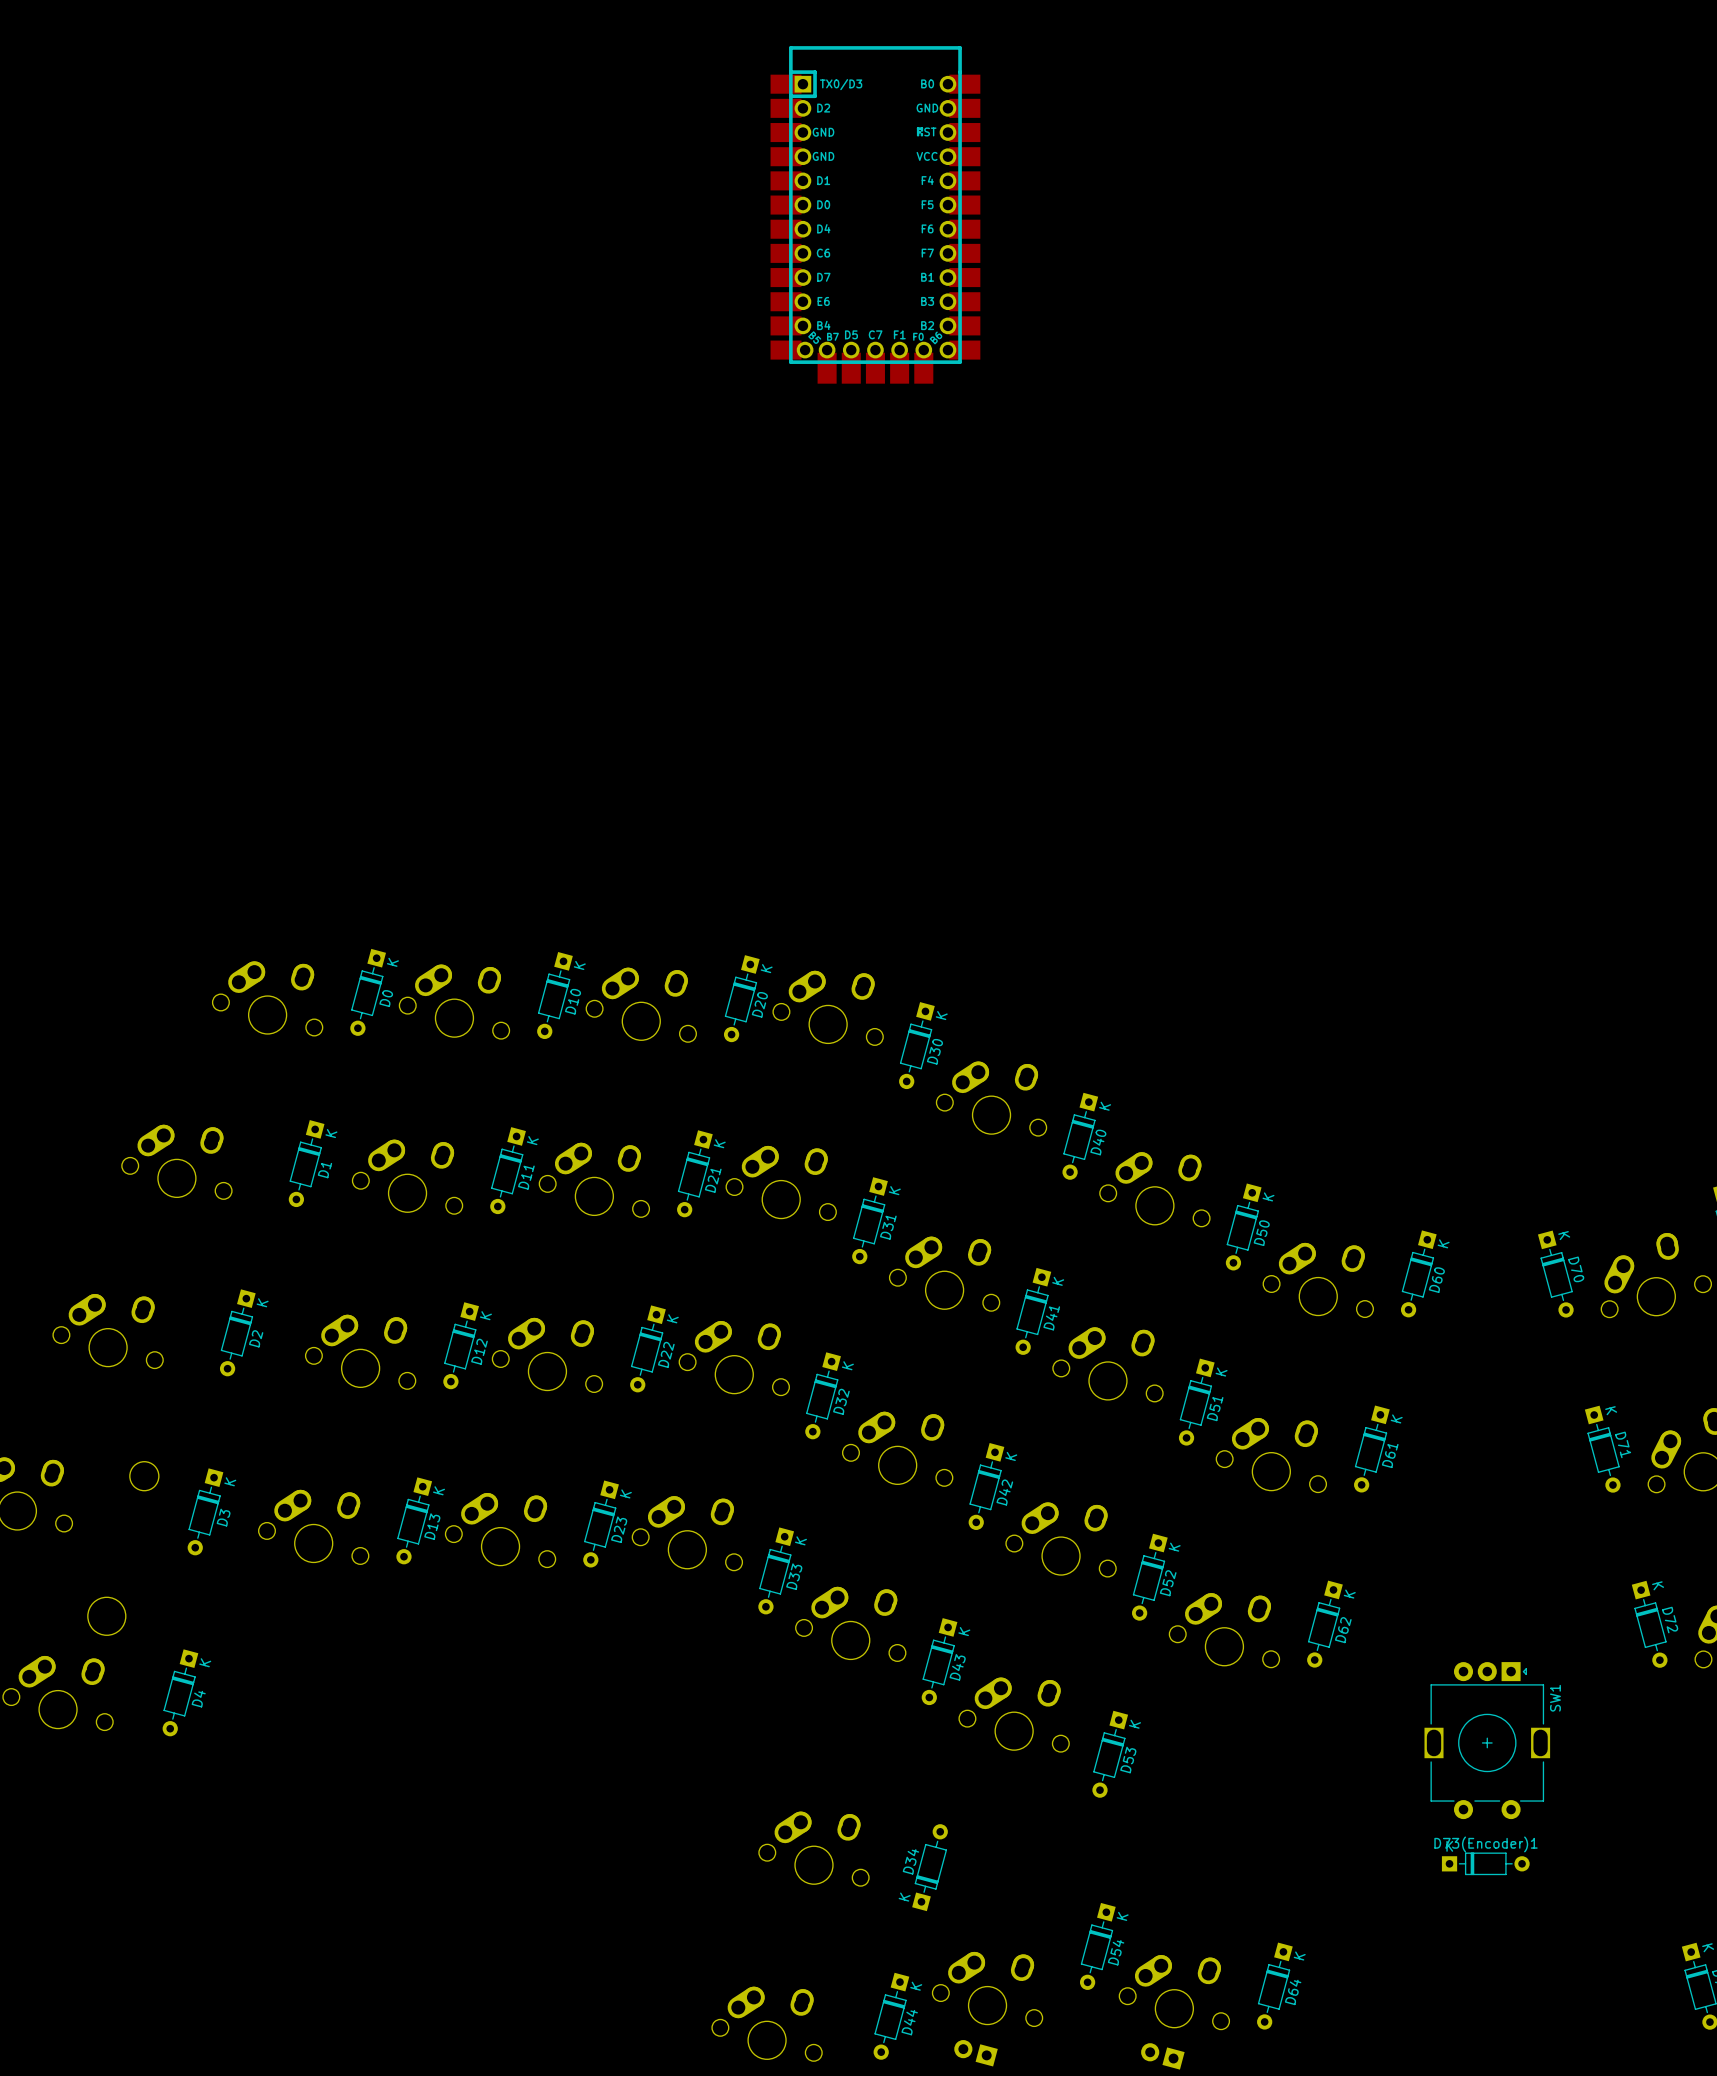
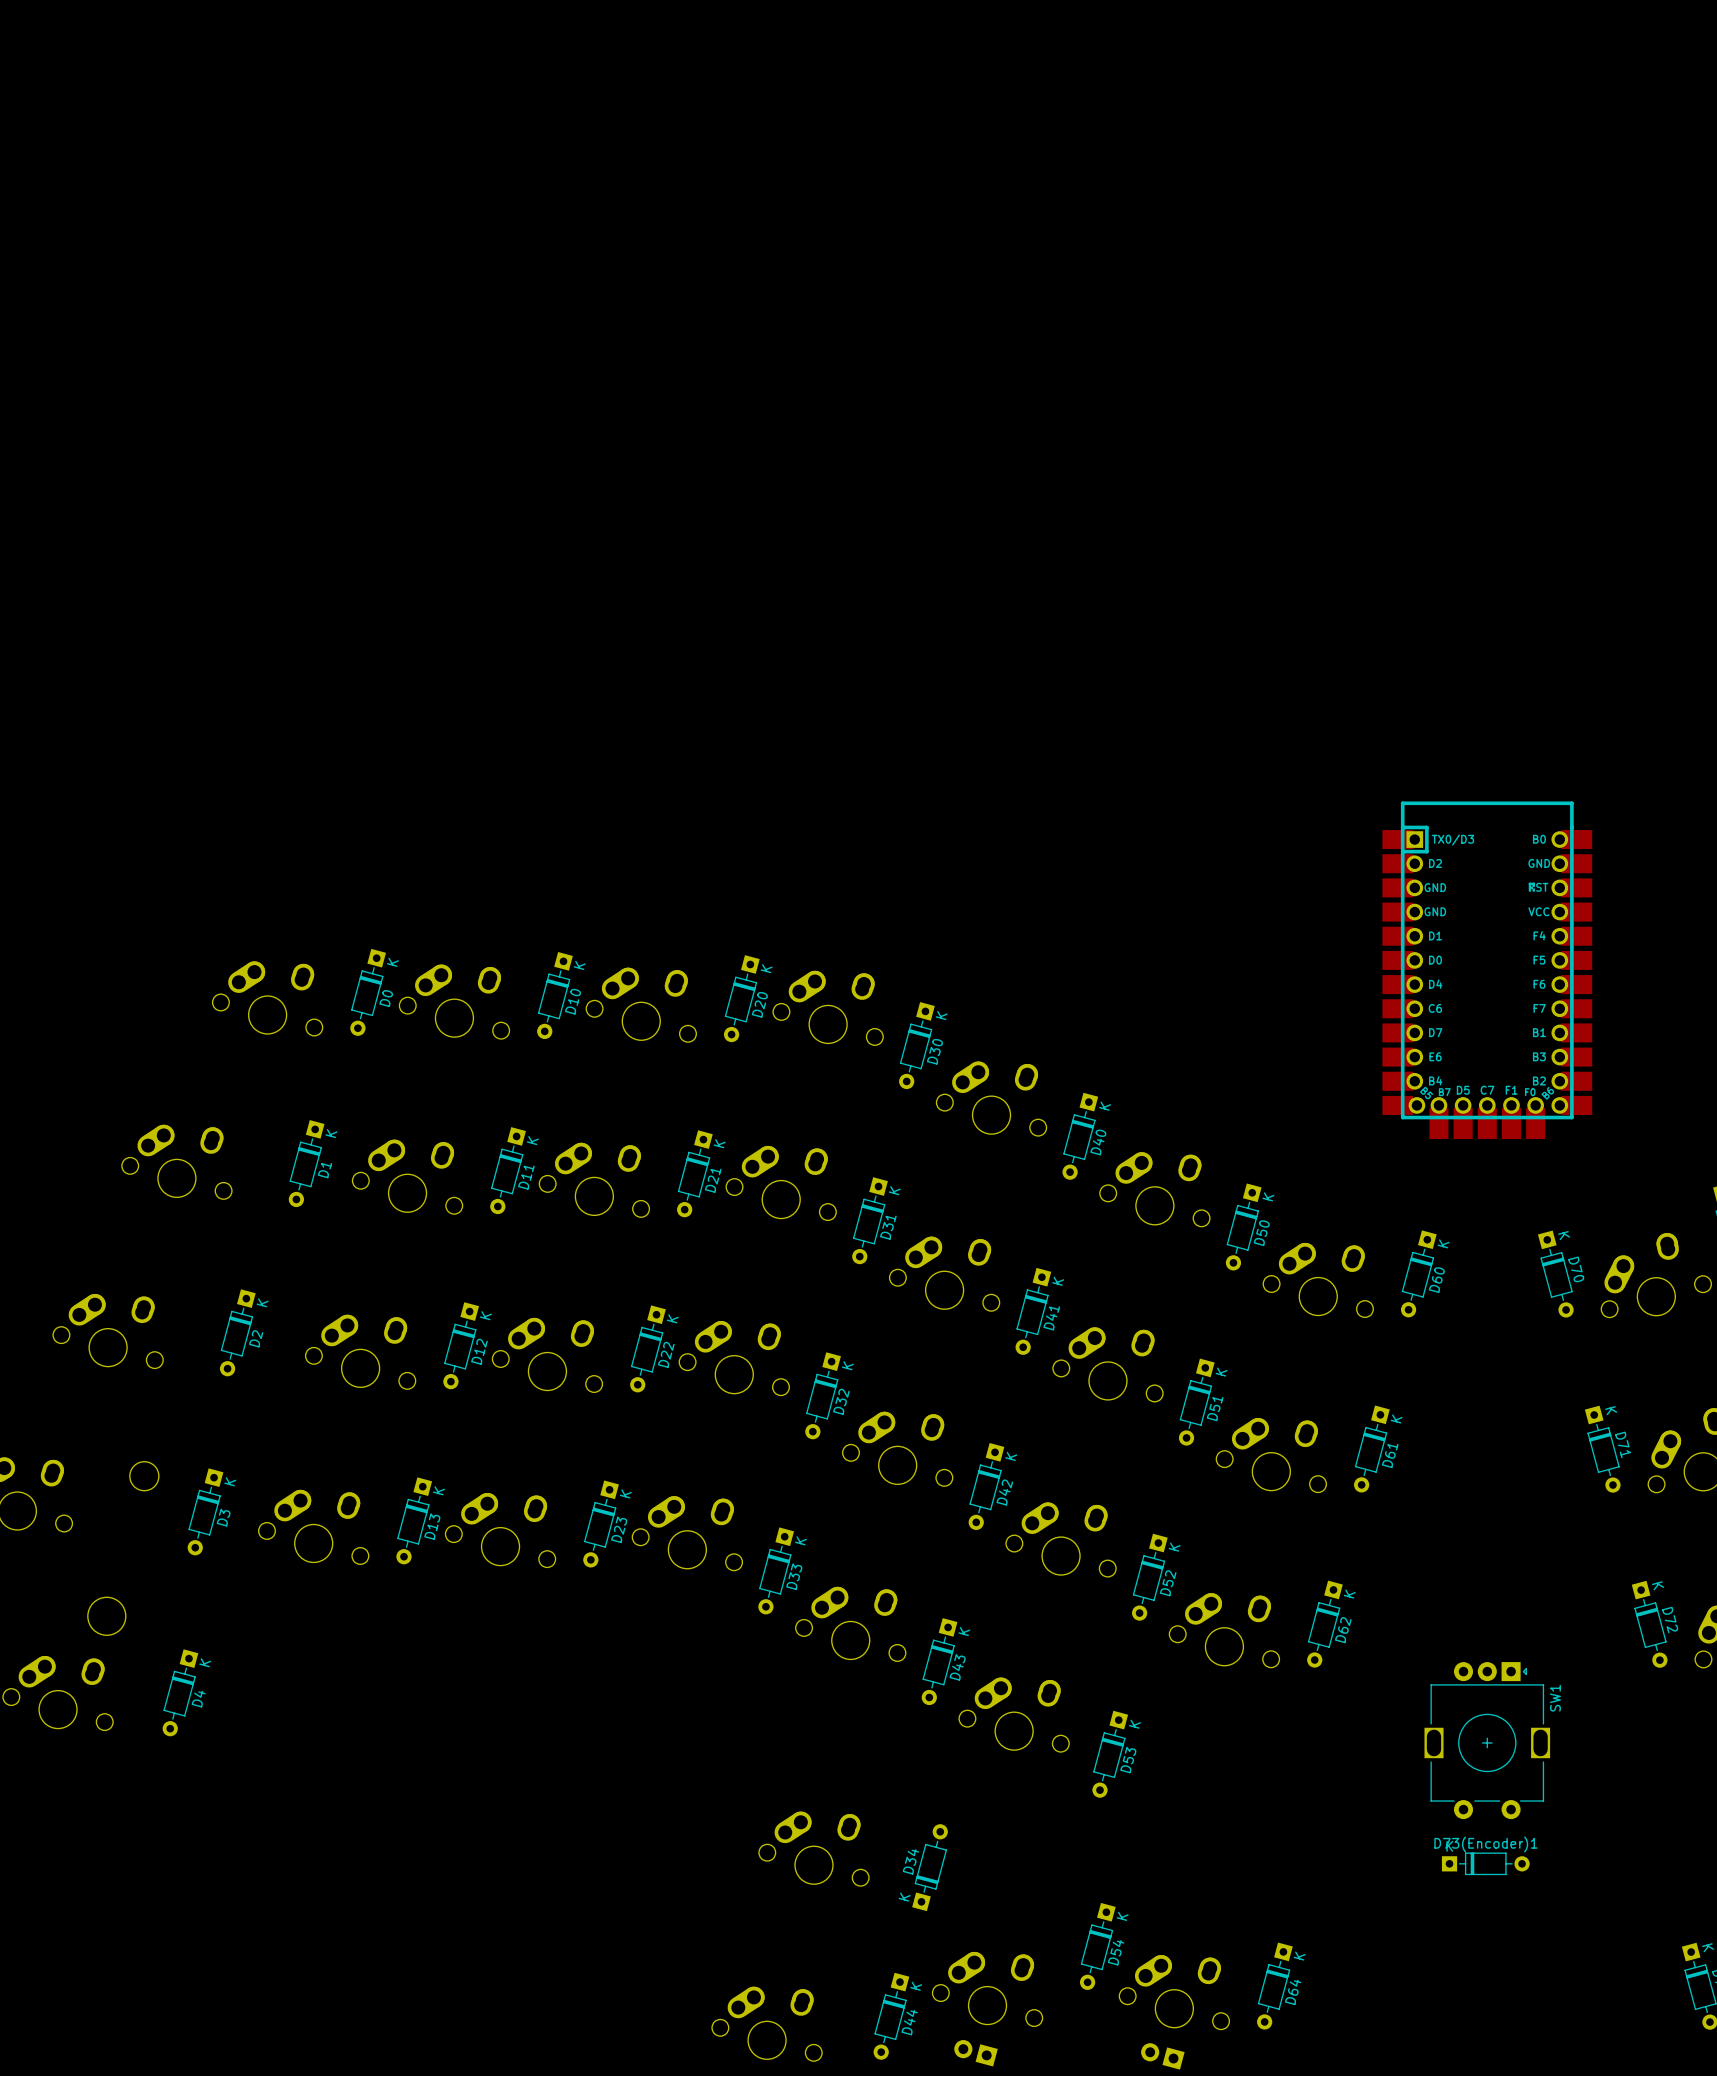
part: (875, 214) -> none
part: none -> (1487, 970)

